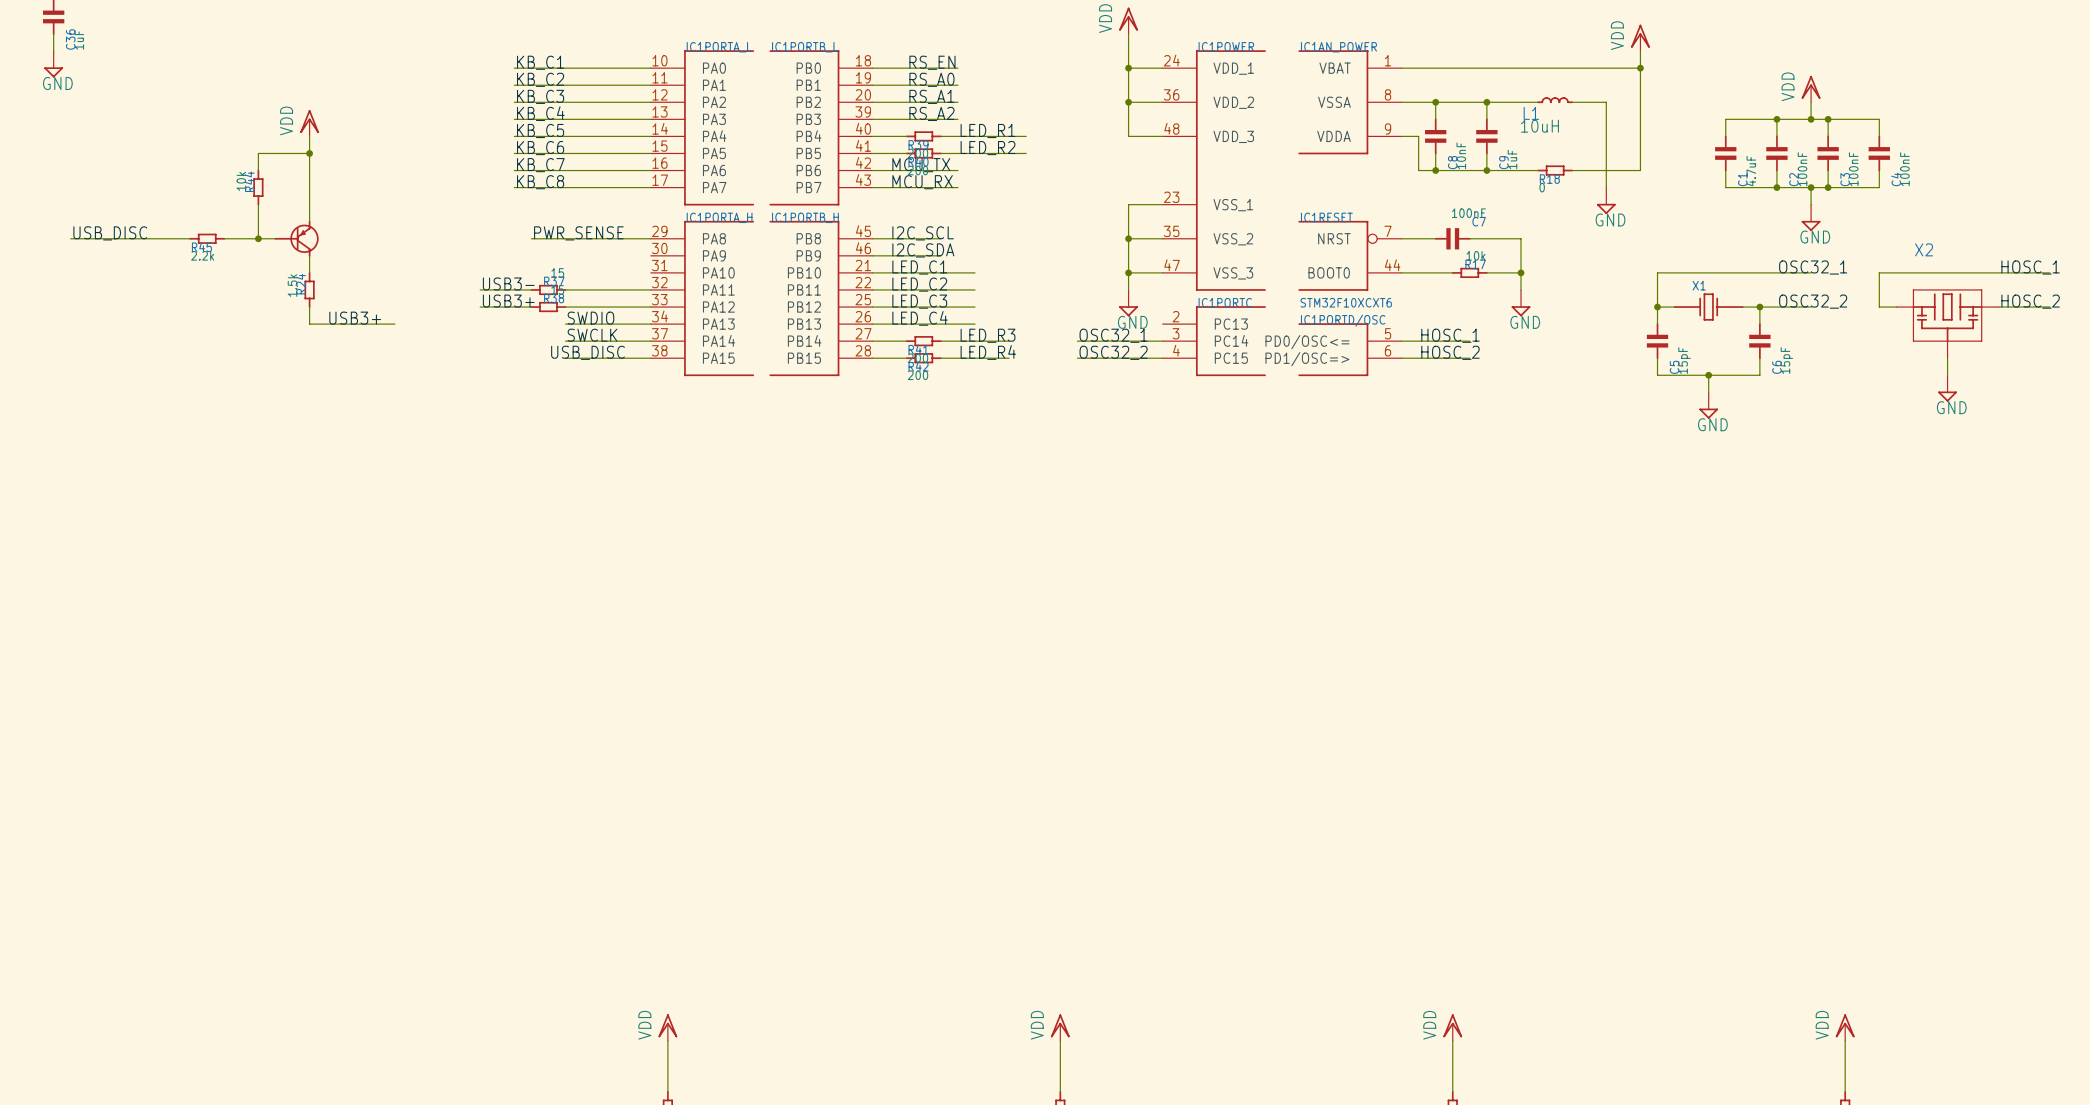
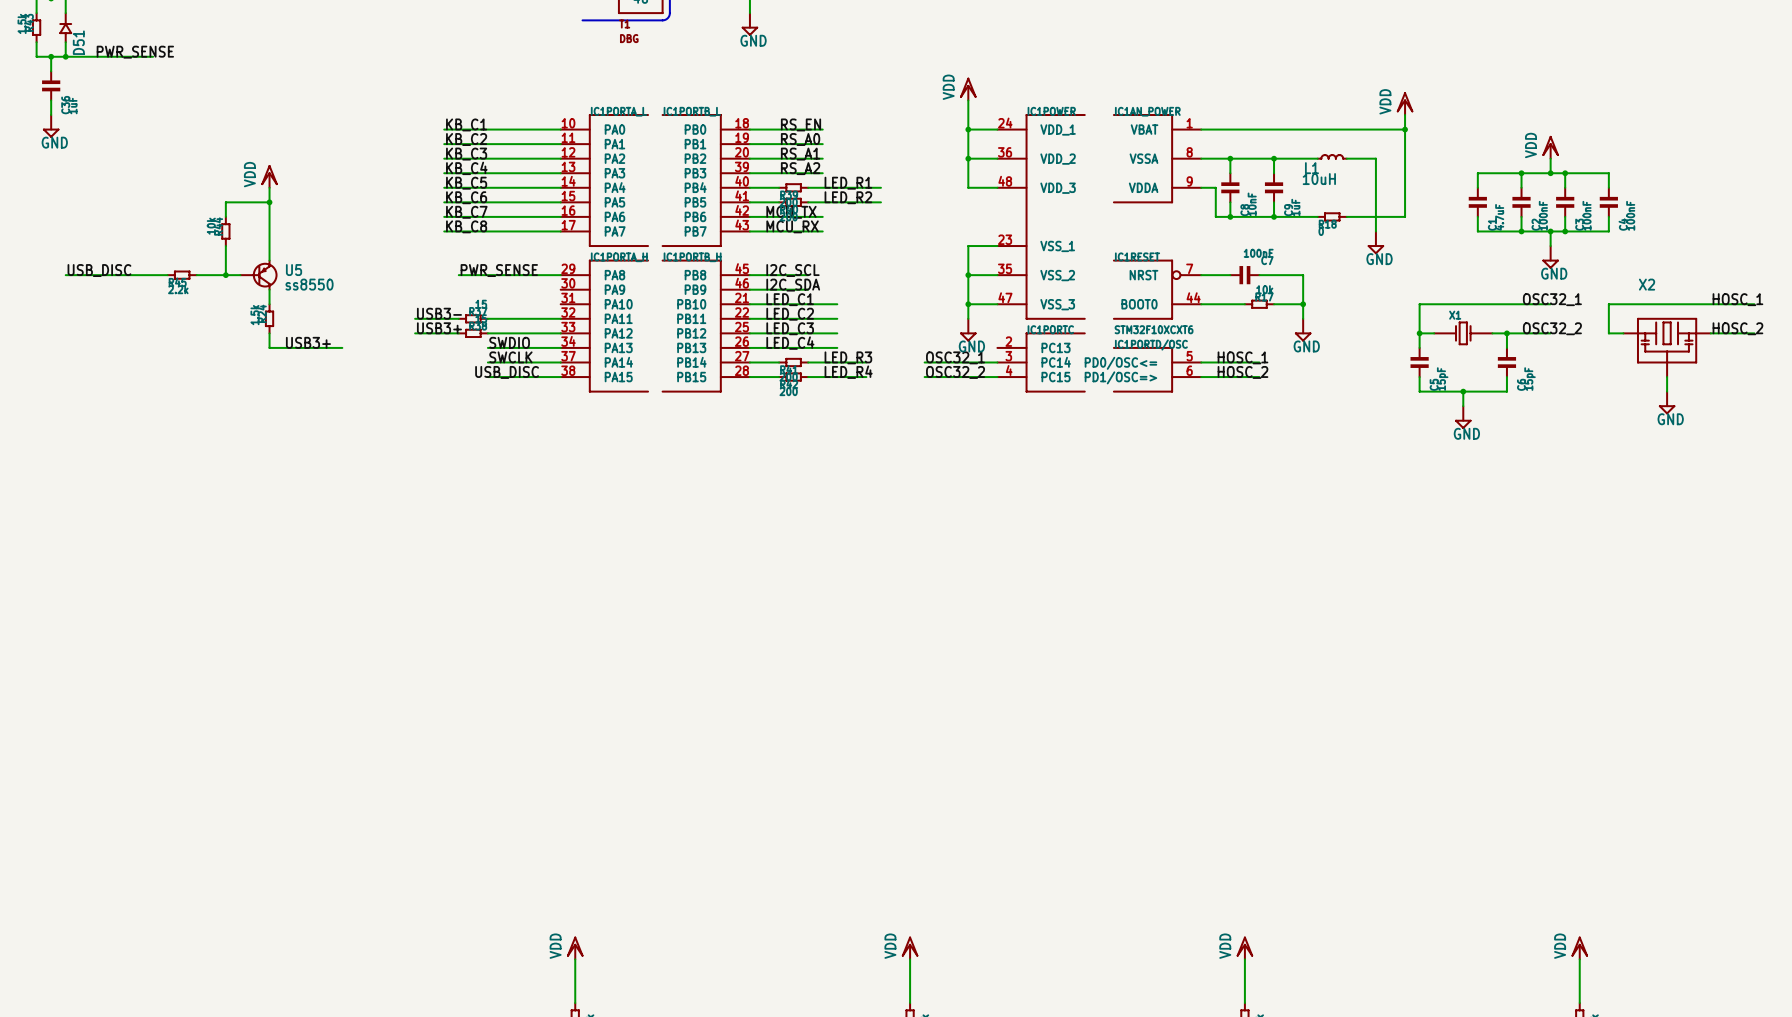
U5 name: none -> U5 (294, 270)
U5 value: none -> ss8550 (309, 284)

